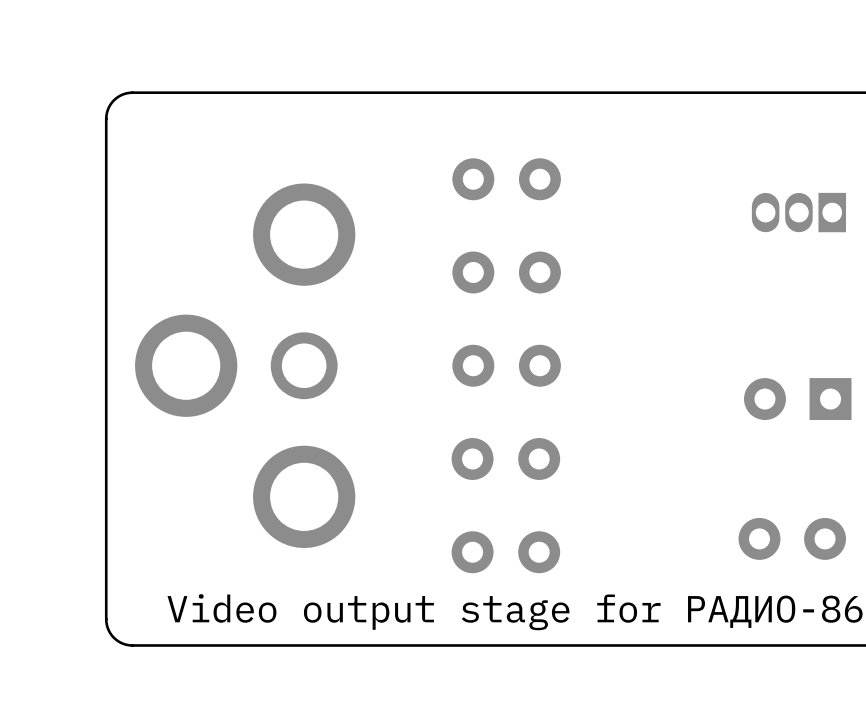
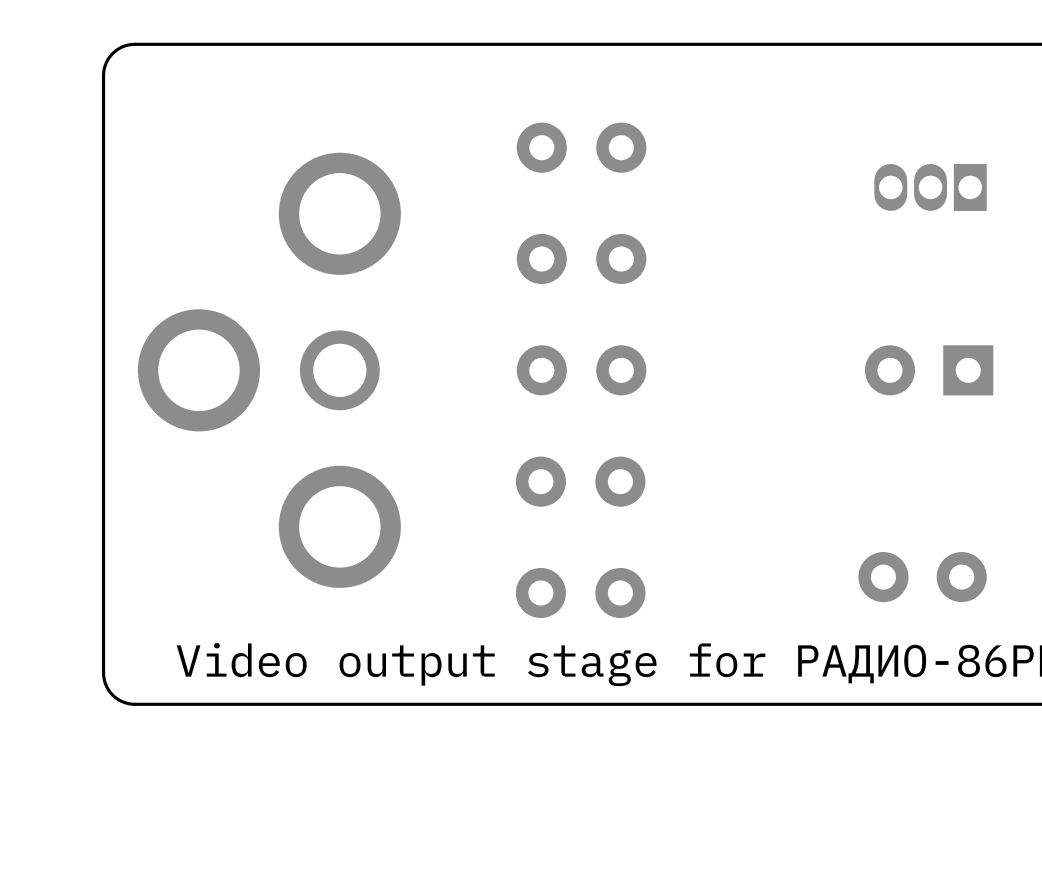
part position: (797, 399) -> (929, 370)

